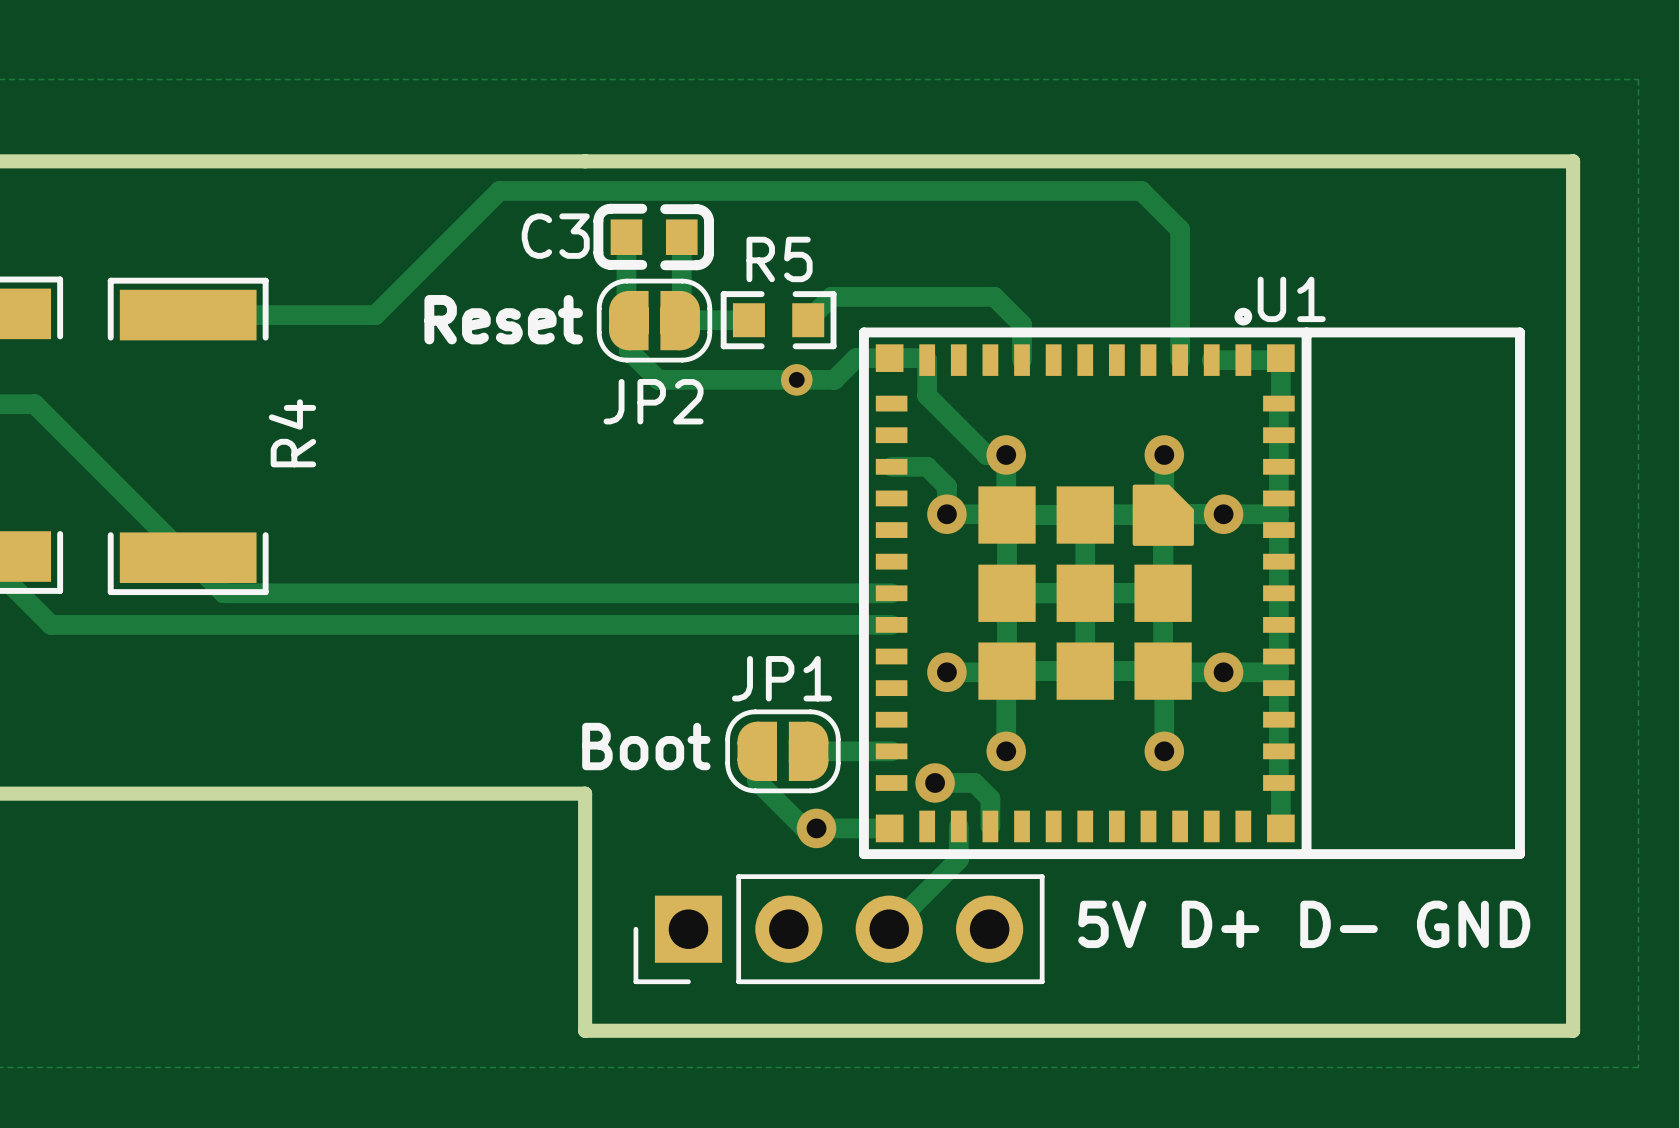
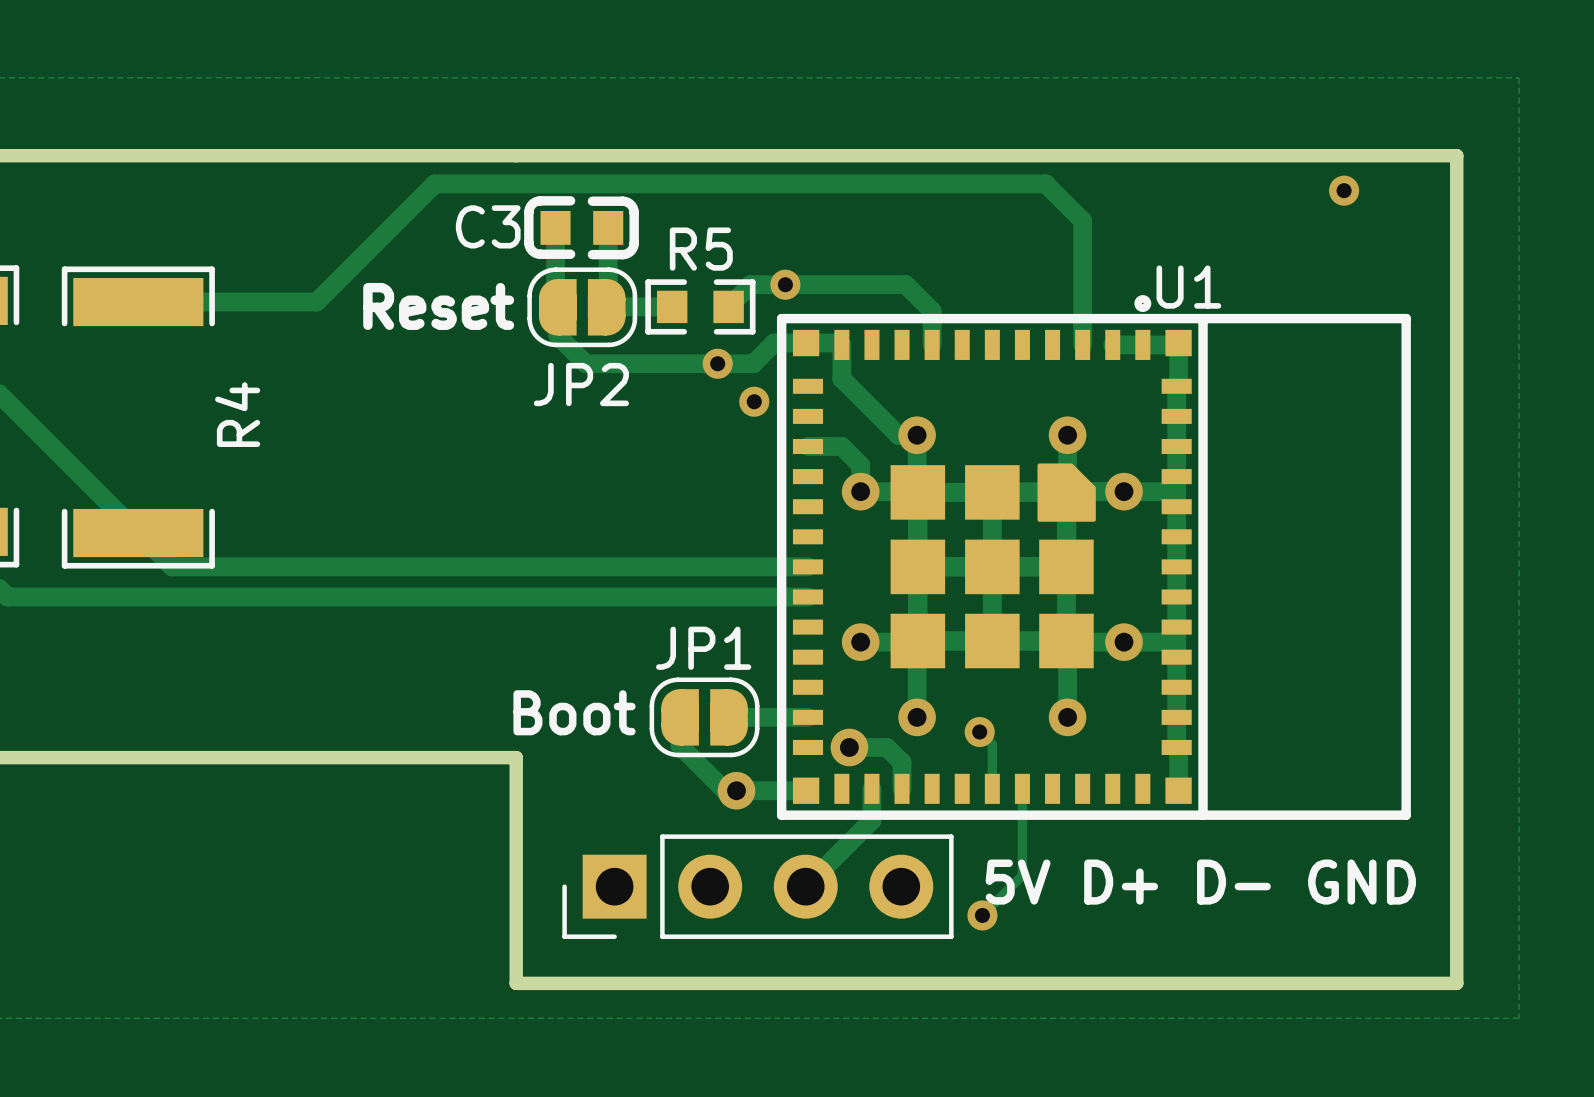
via: none -> (1344, 190)
via: none -> (785, 284)
via: none -> (754, 401)
track: none -> (979, 731) (992, 744) (992, 788)
via: none -> (979, 731)
track: none -> (1022, 788) (1022, 875) (982, 915)
via: none -> (982, 915)

